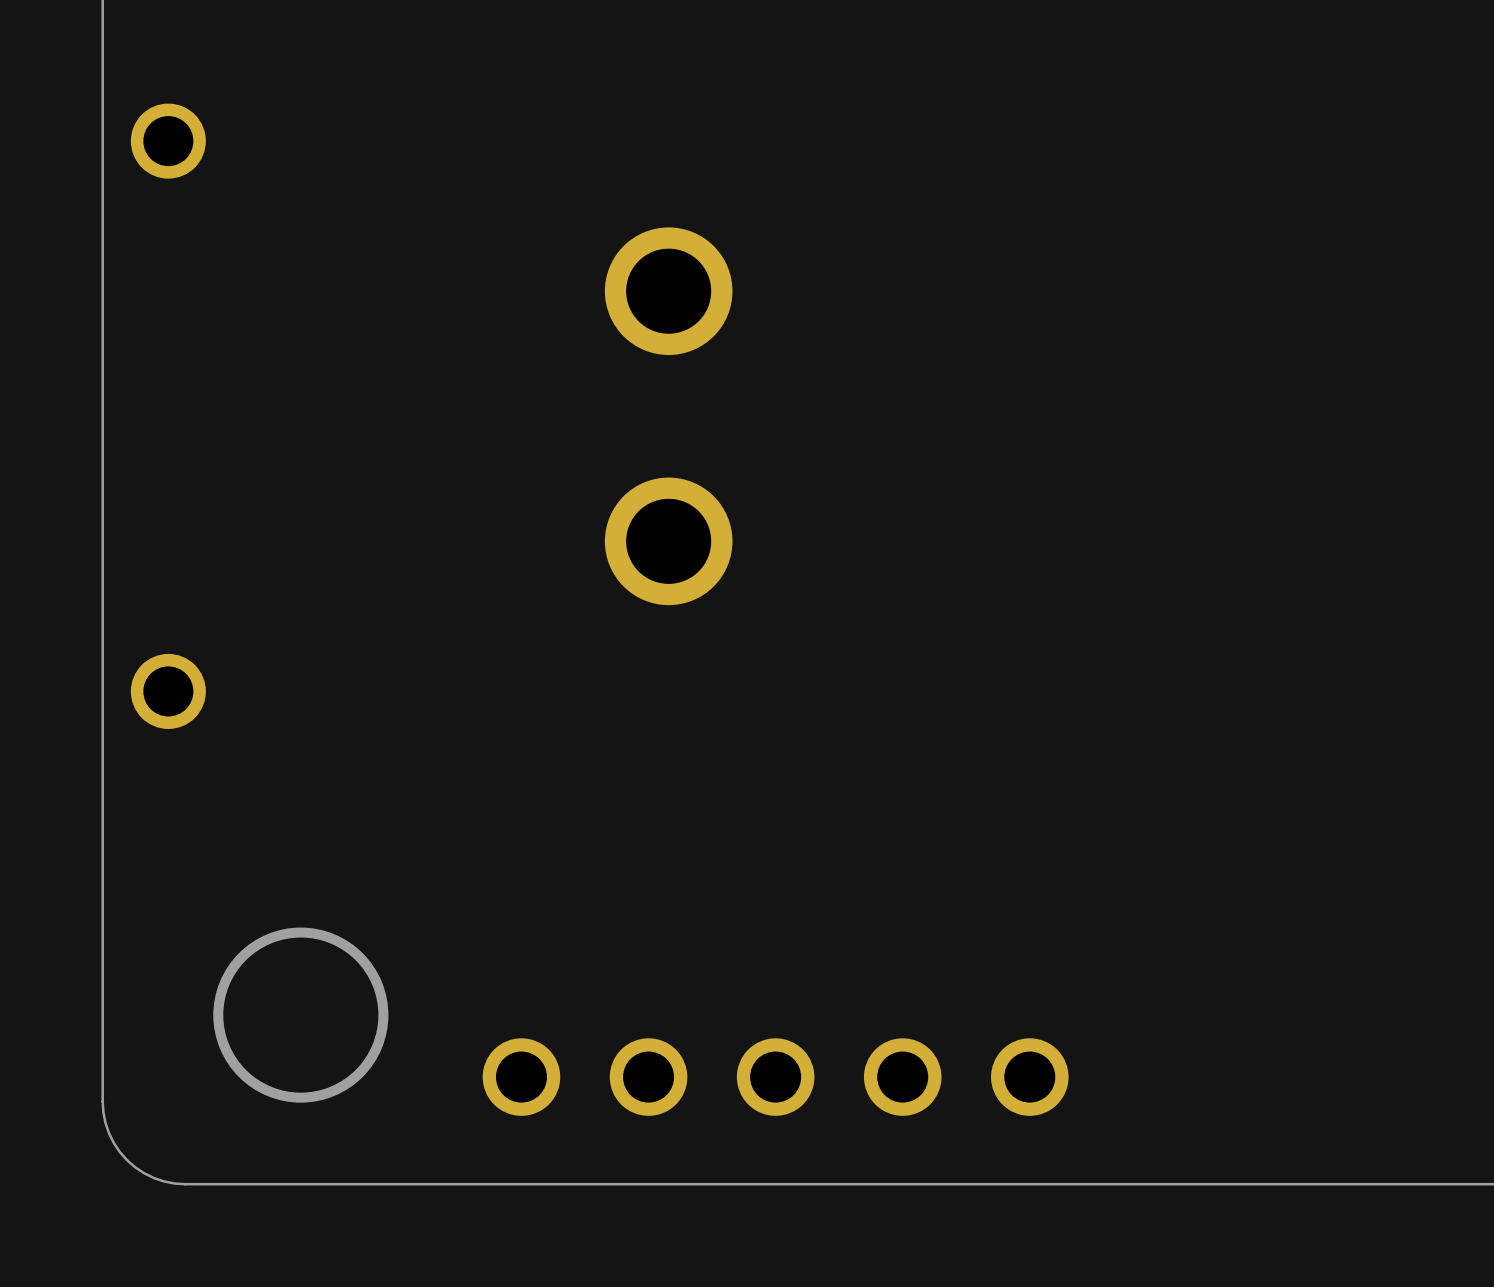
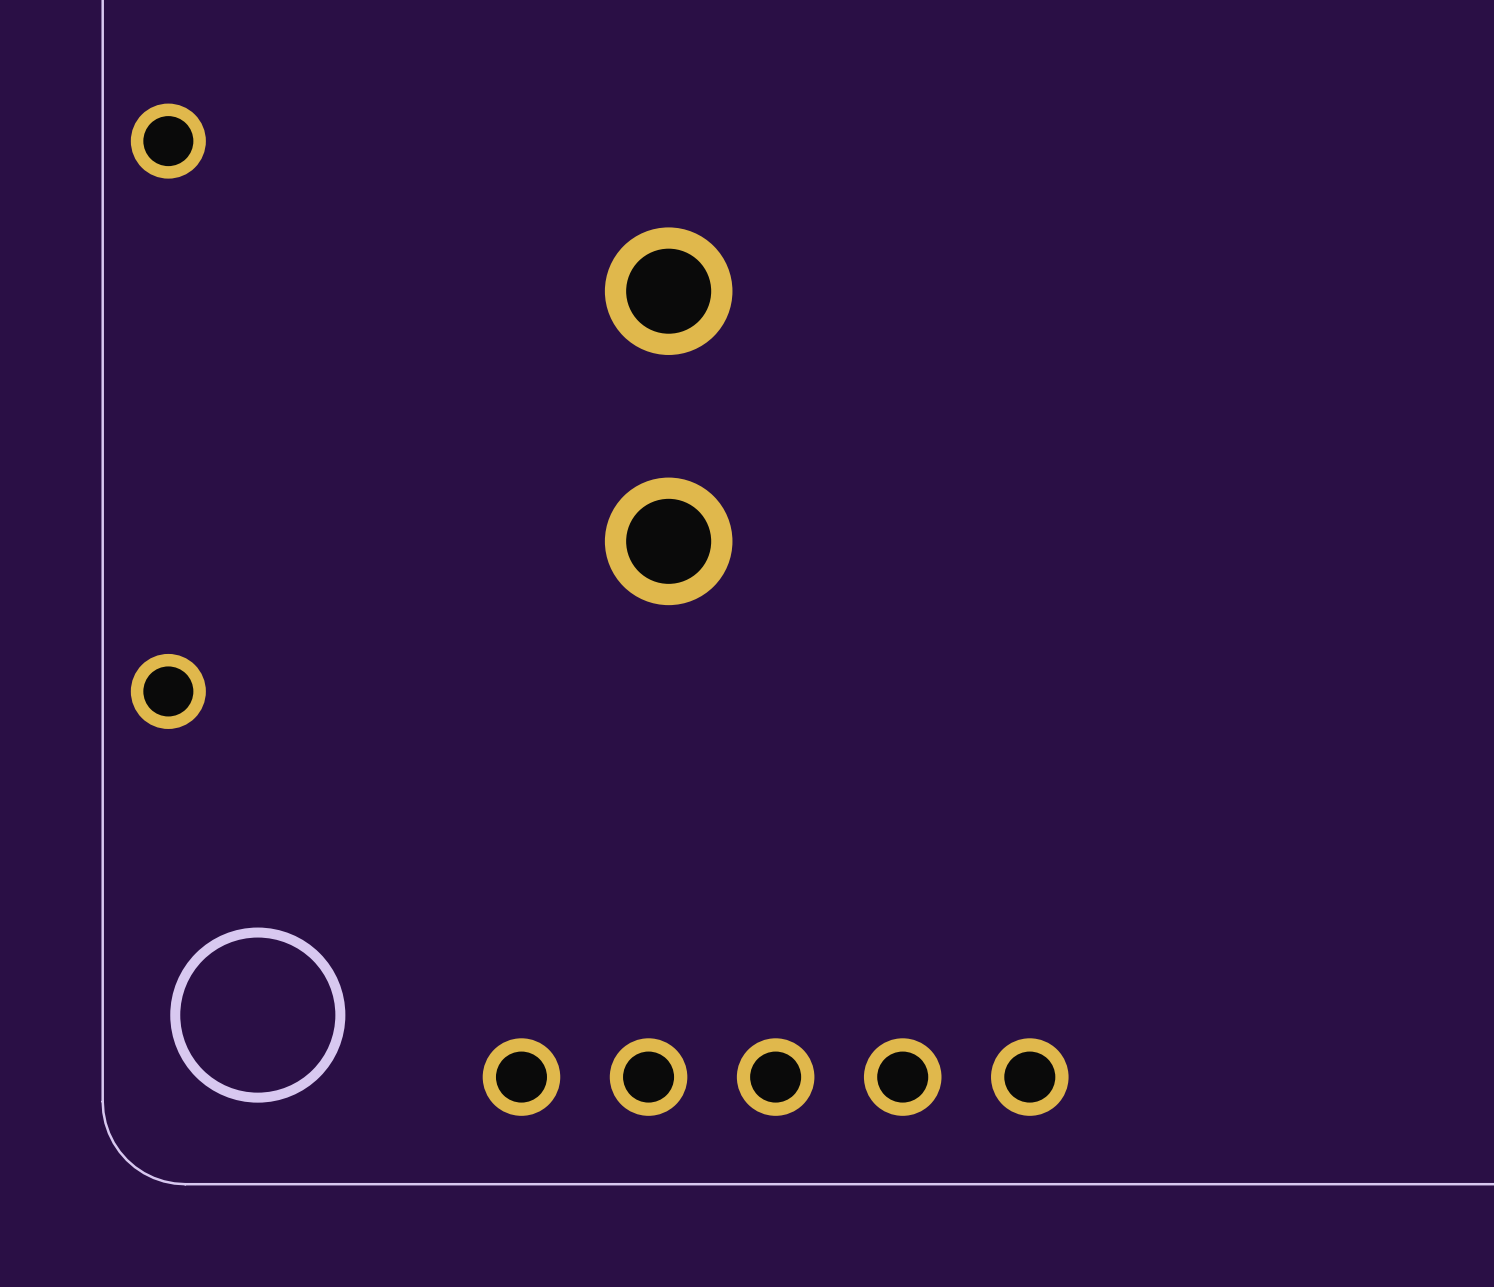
round board edge position: (300, 1015) -> (257, 1015)

